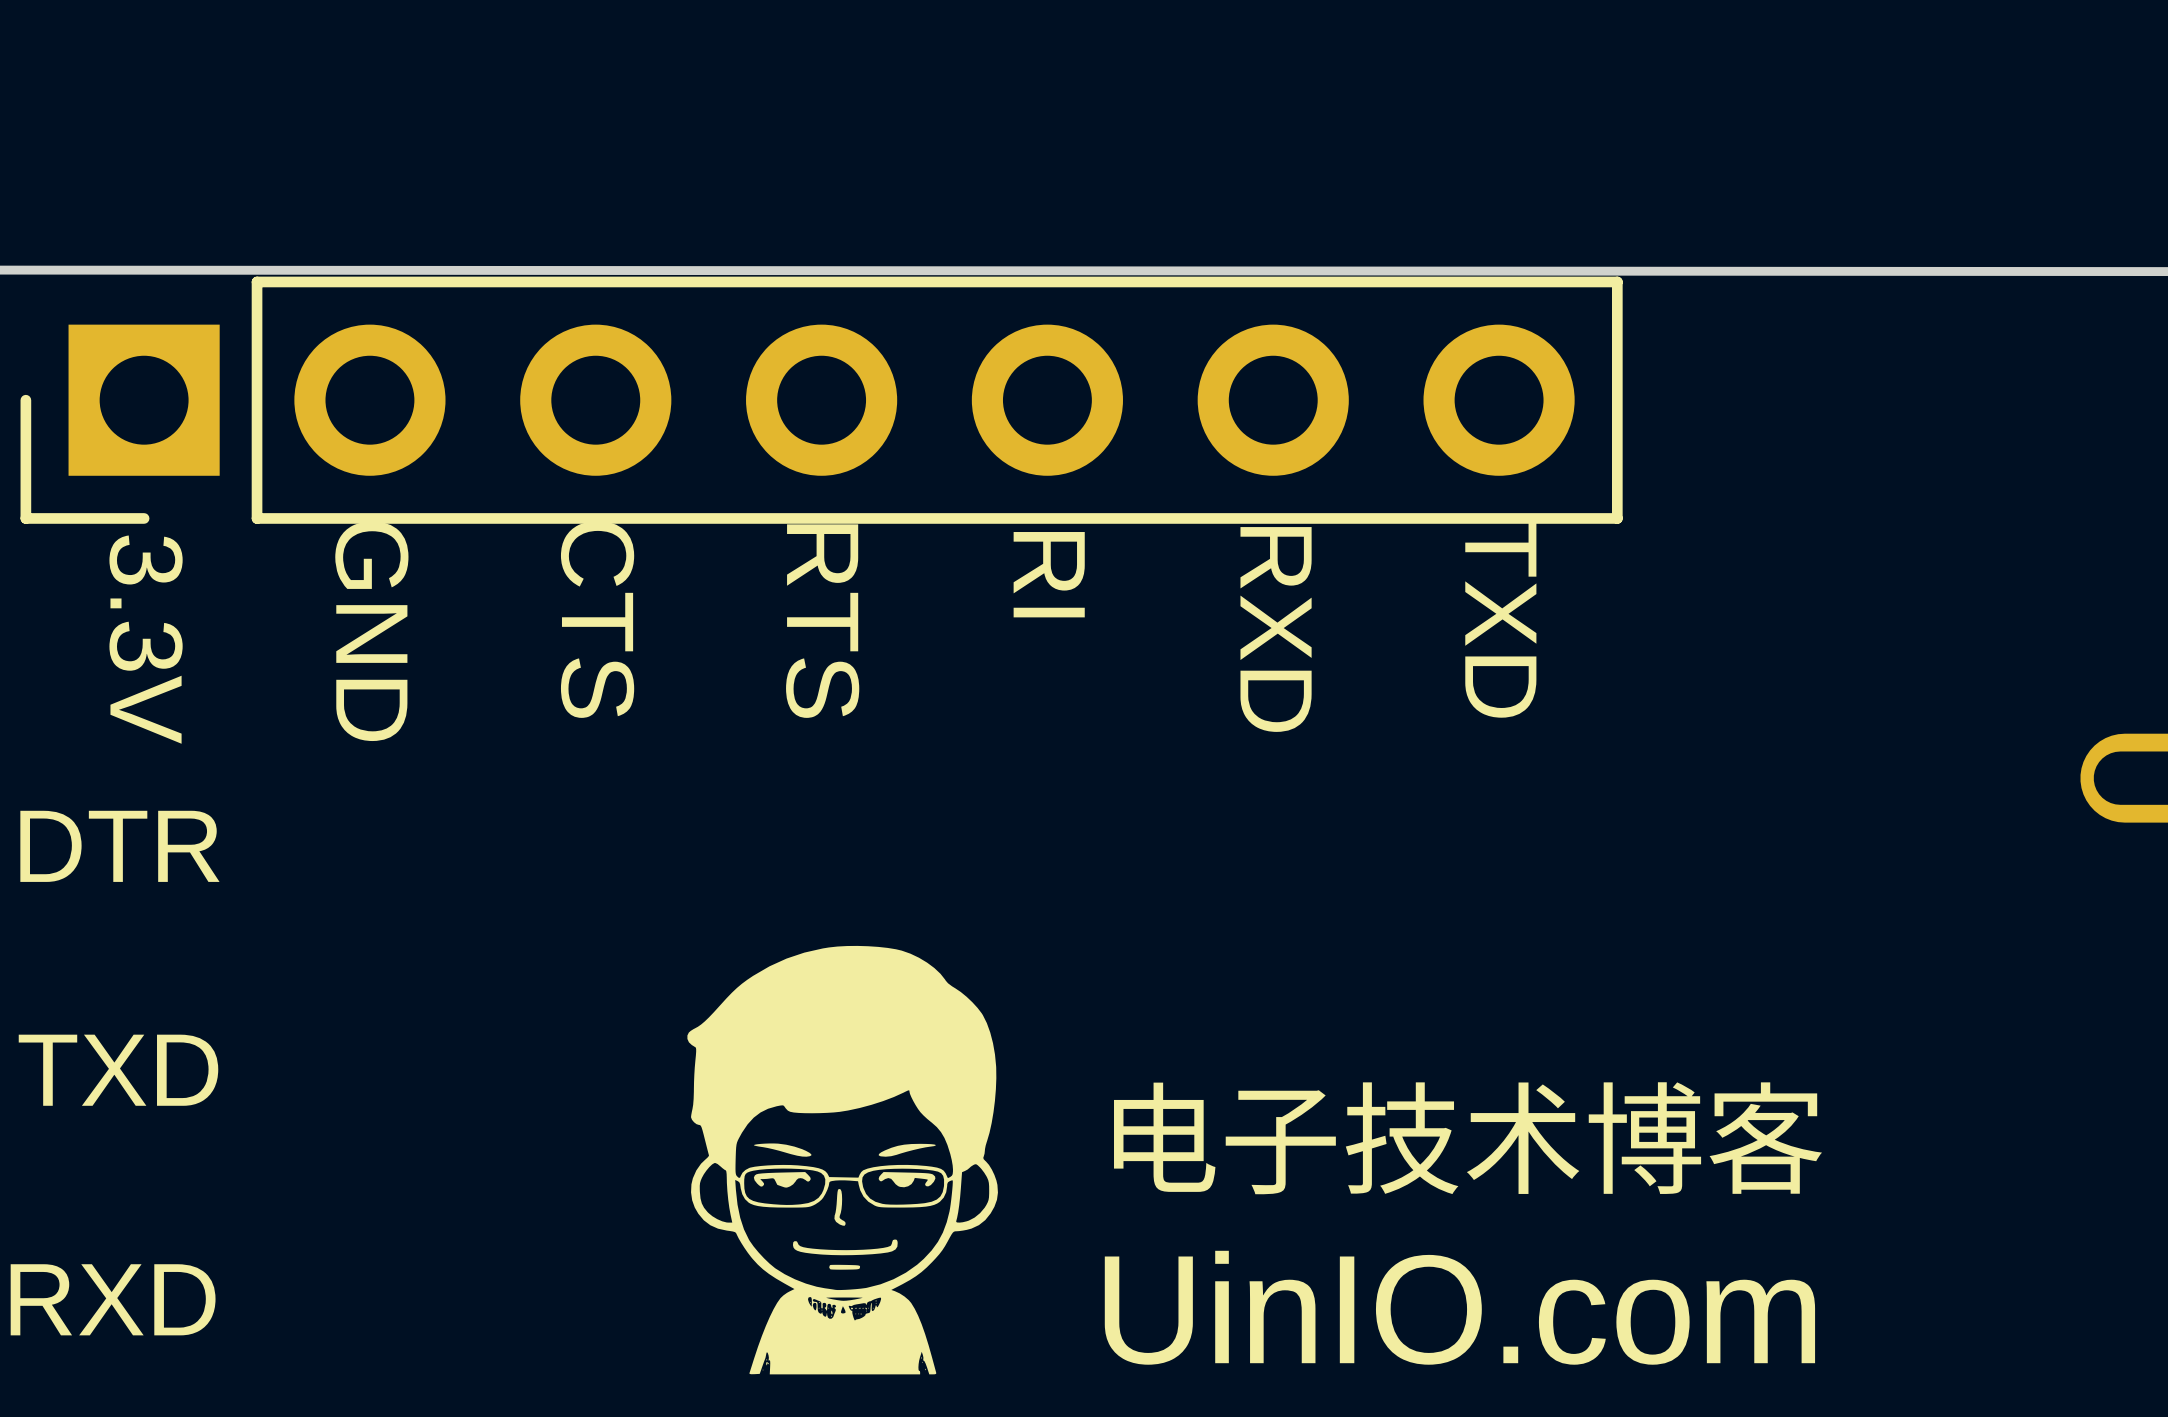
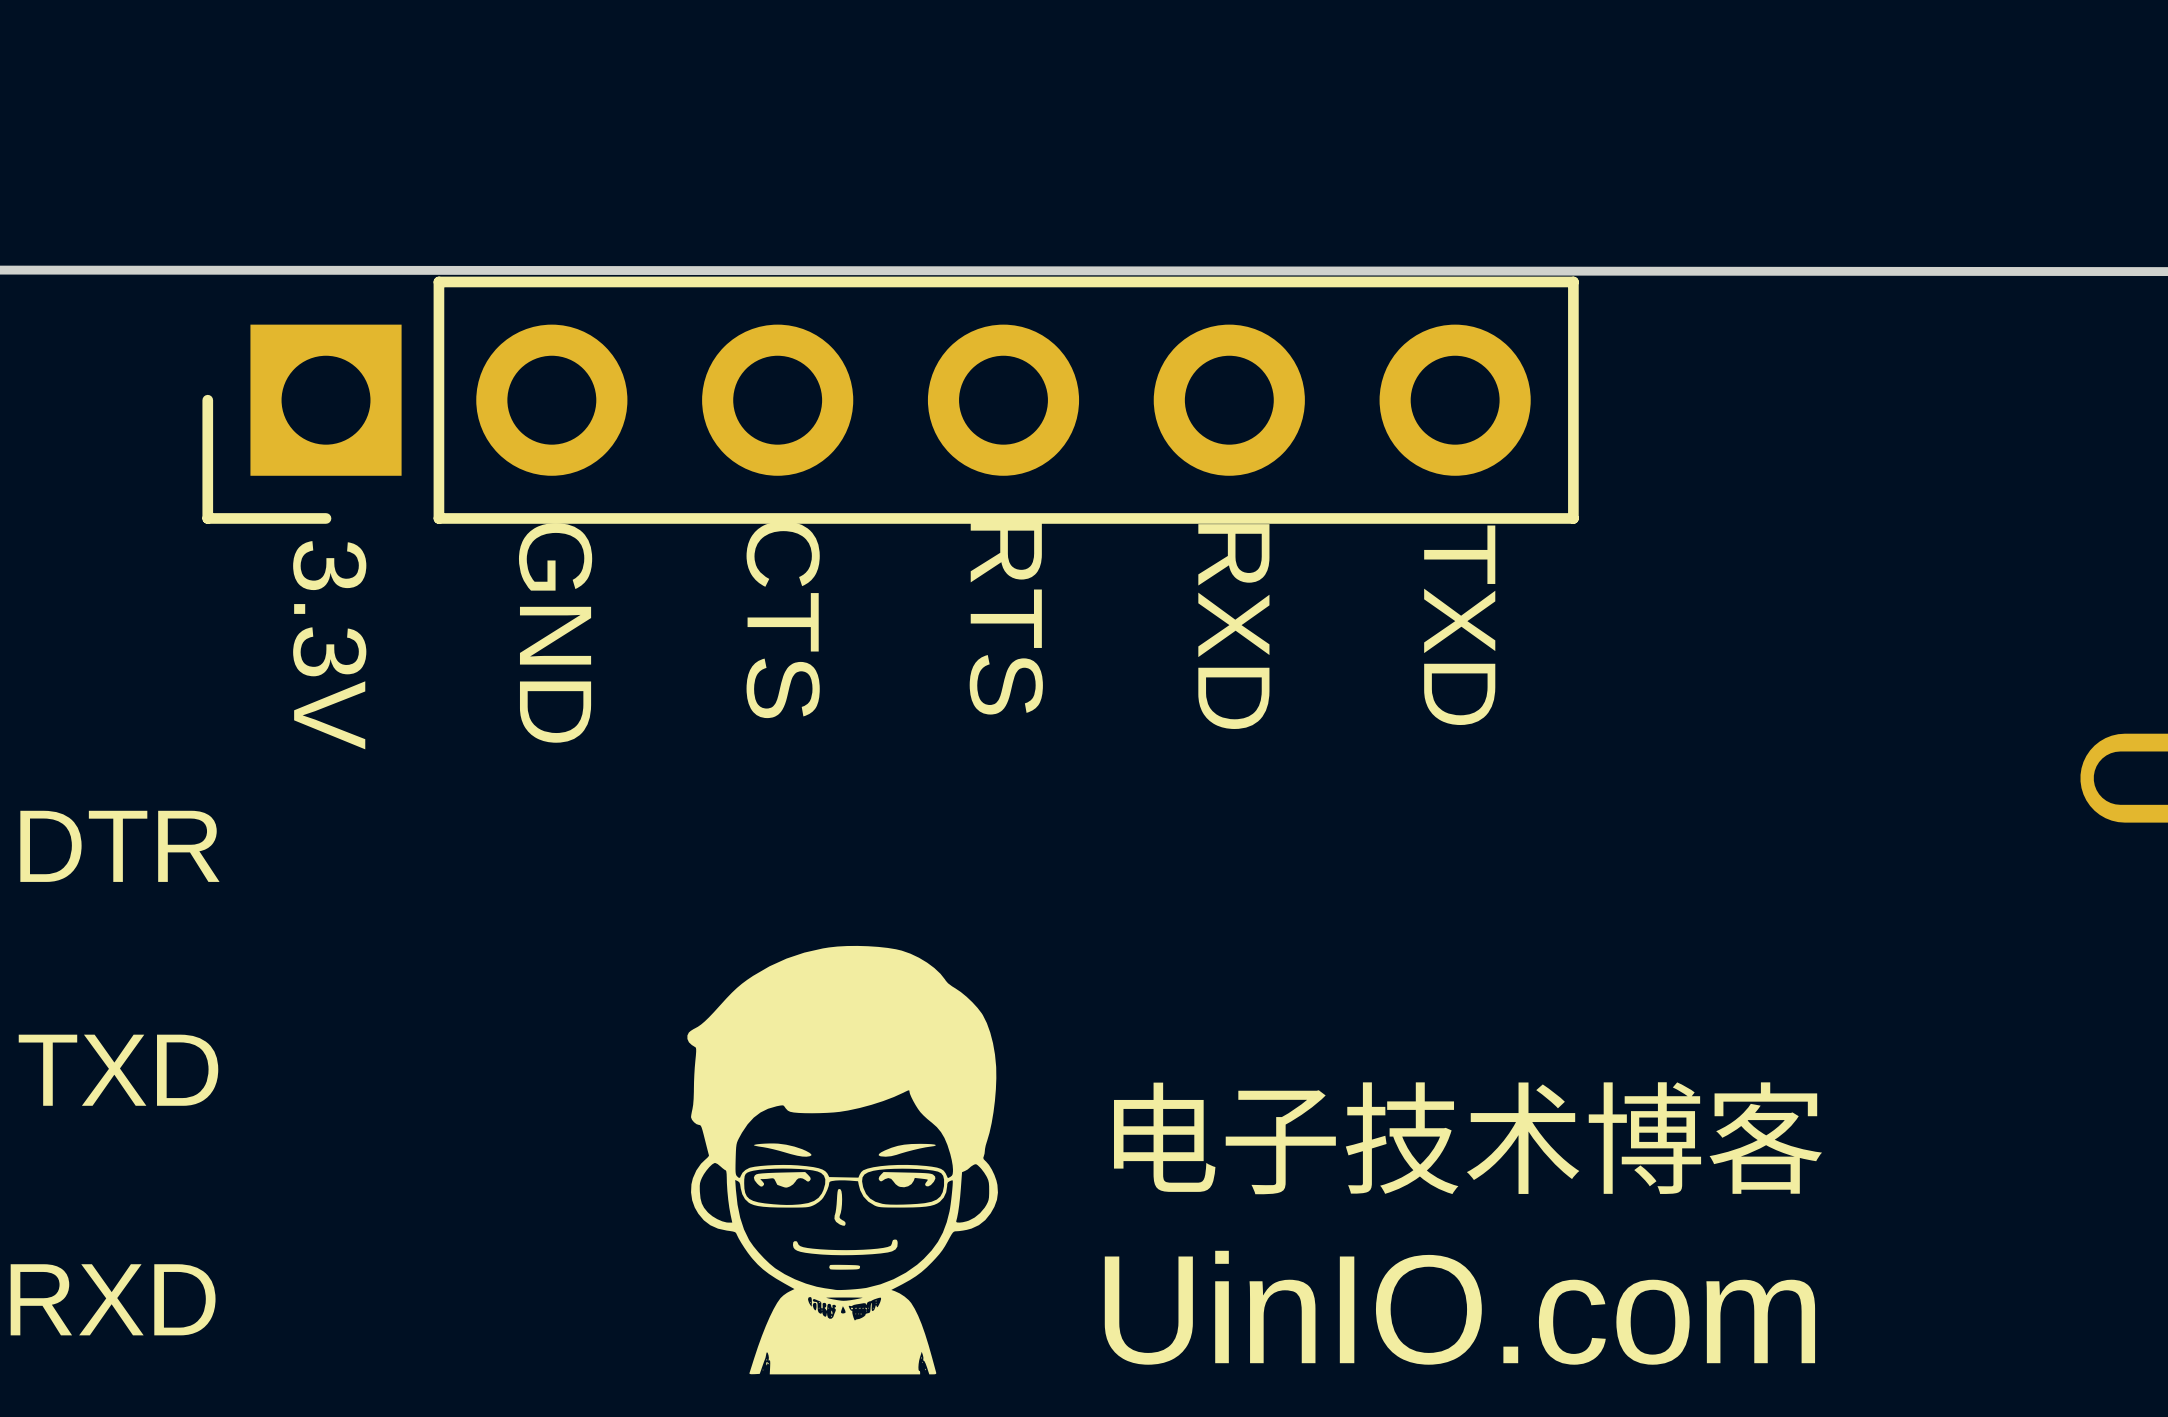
part footprint: [20, 276, 1623, 524] -> [202, 276, 1579, 524]
text: RI (1049, 574) -> none
text position: TXD (1500, 617) -> TXD (1459, 625)
text position: CTS (597, 619) -> CTS (783, 619)
text position: RTS (822, 621) -> RTS (1006, 617)
text position: RXD (1276, 629) -> RXD (1233, 626)
text position: GND (371, 631) -> GND (555, 632)
text position: 3.3V (146, 639) -> 3.3V (329, 645)

